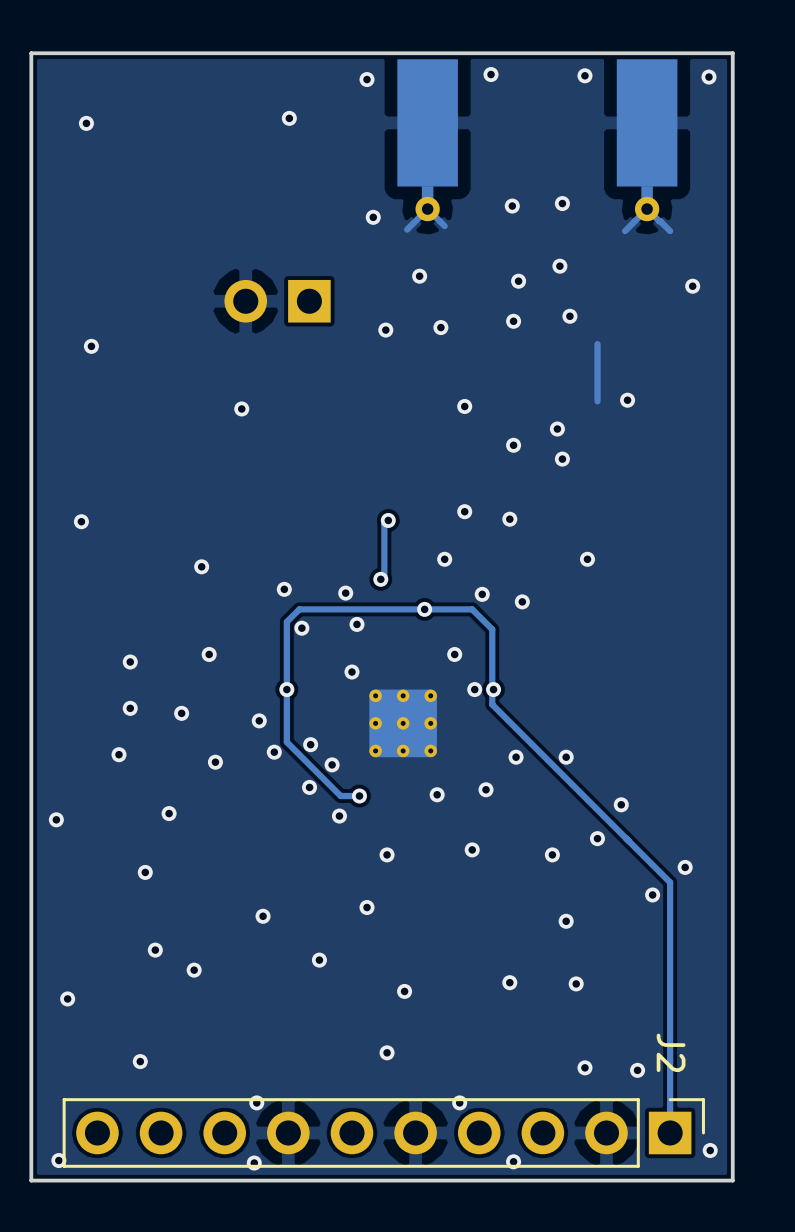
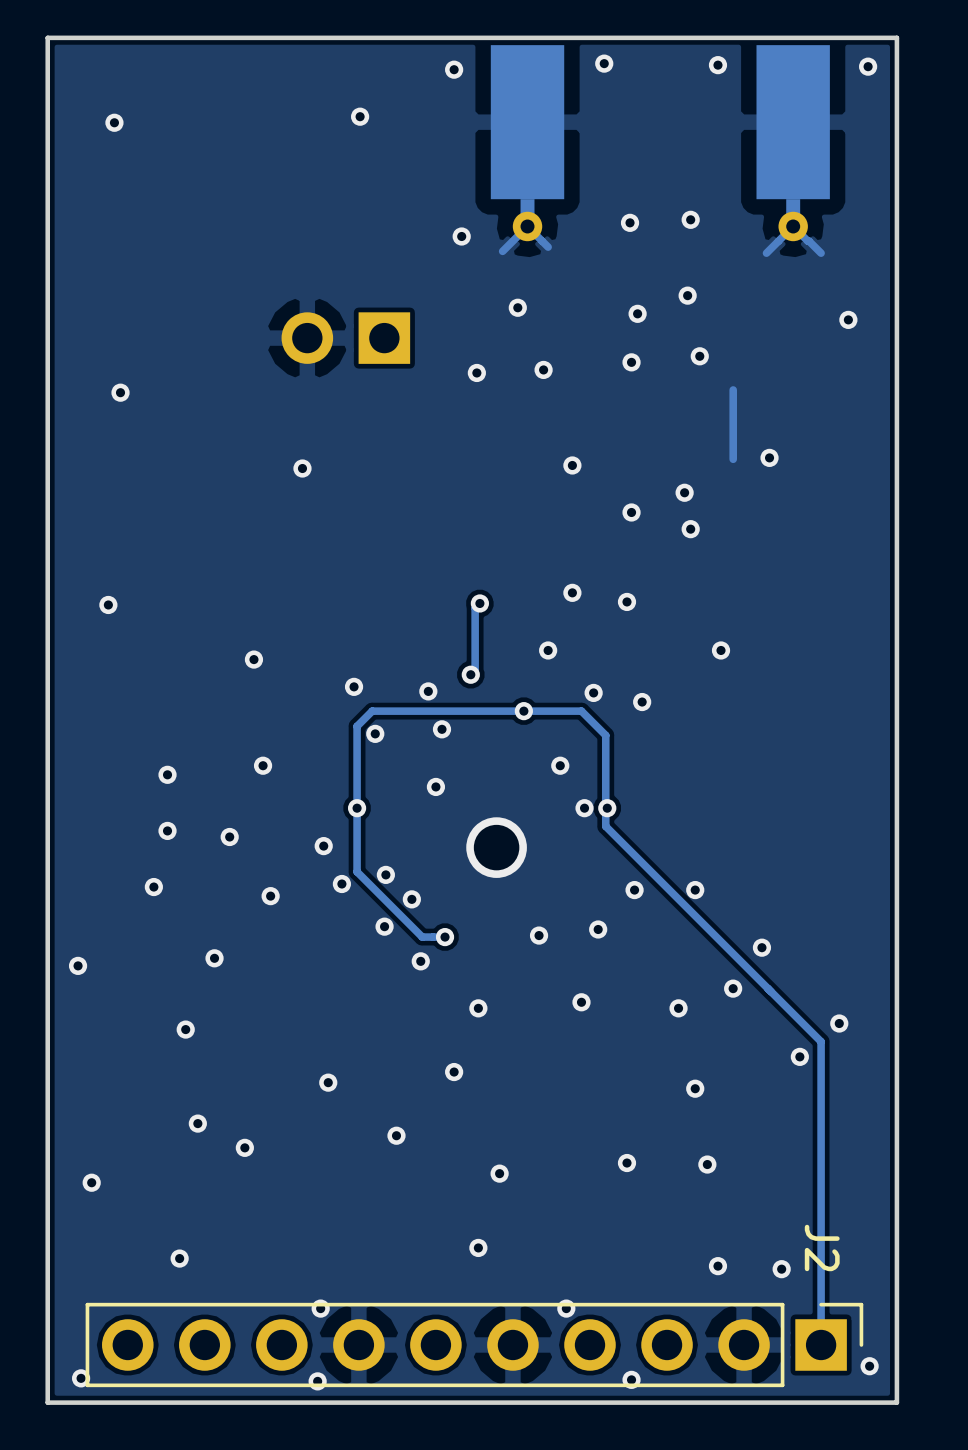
via: none -> (496, 847)
part: (403, 723) -> none

